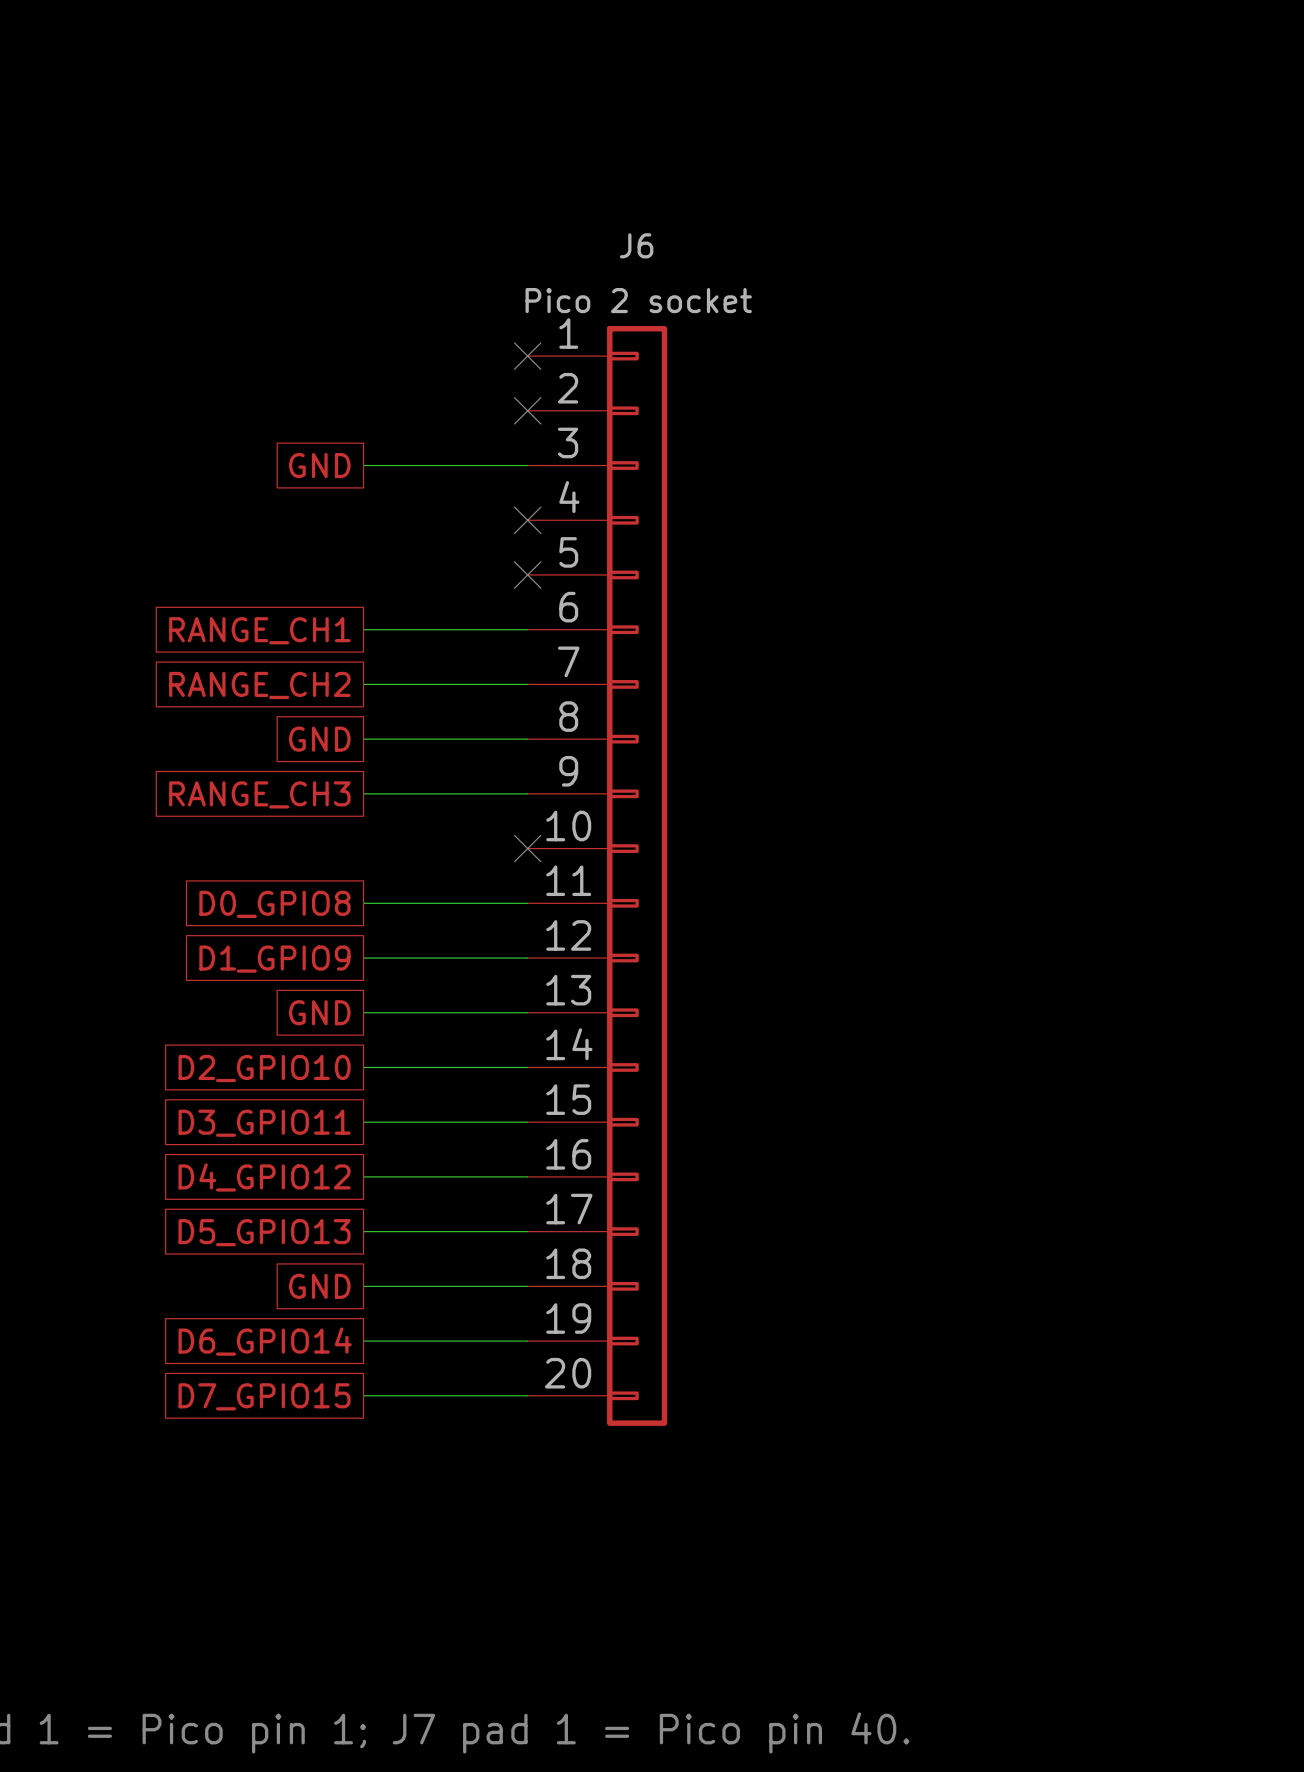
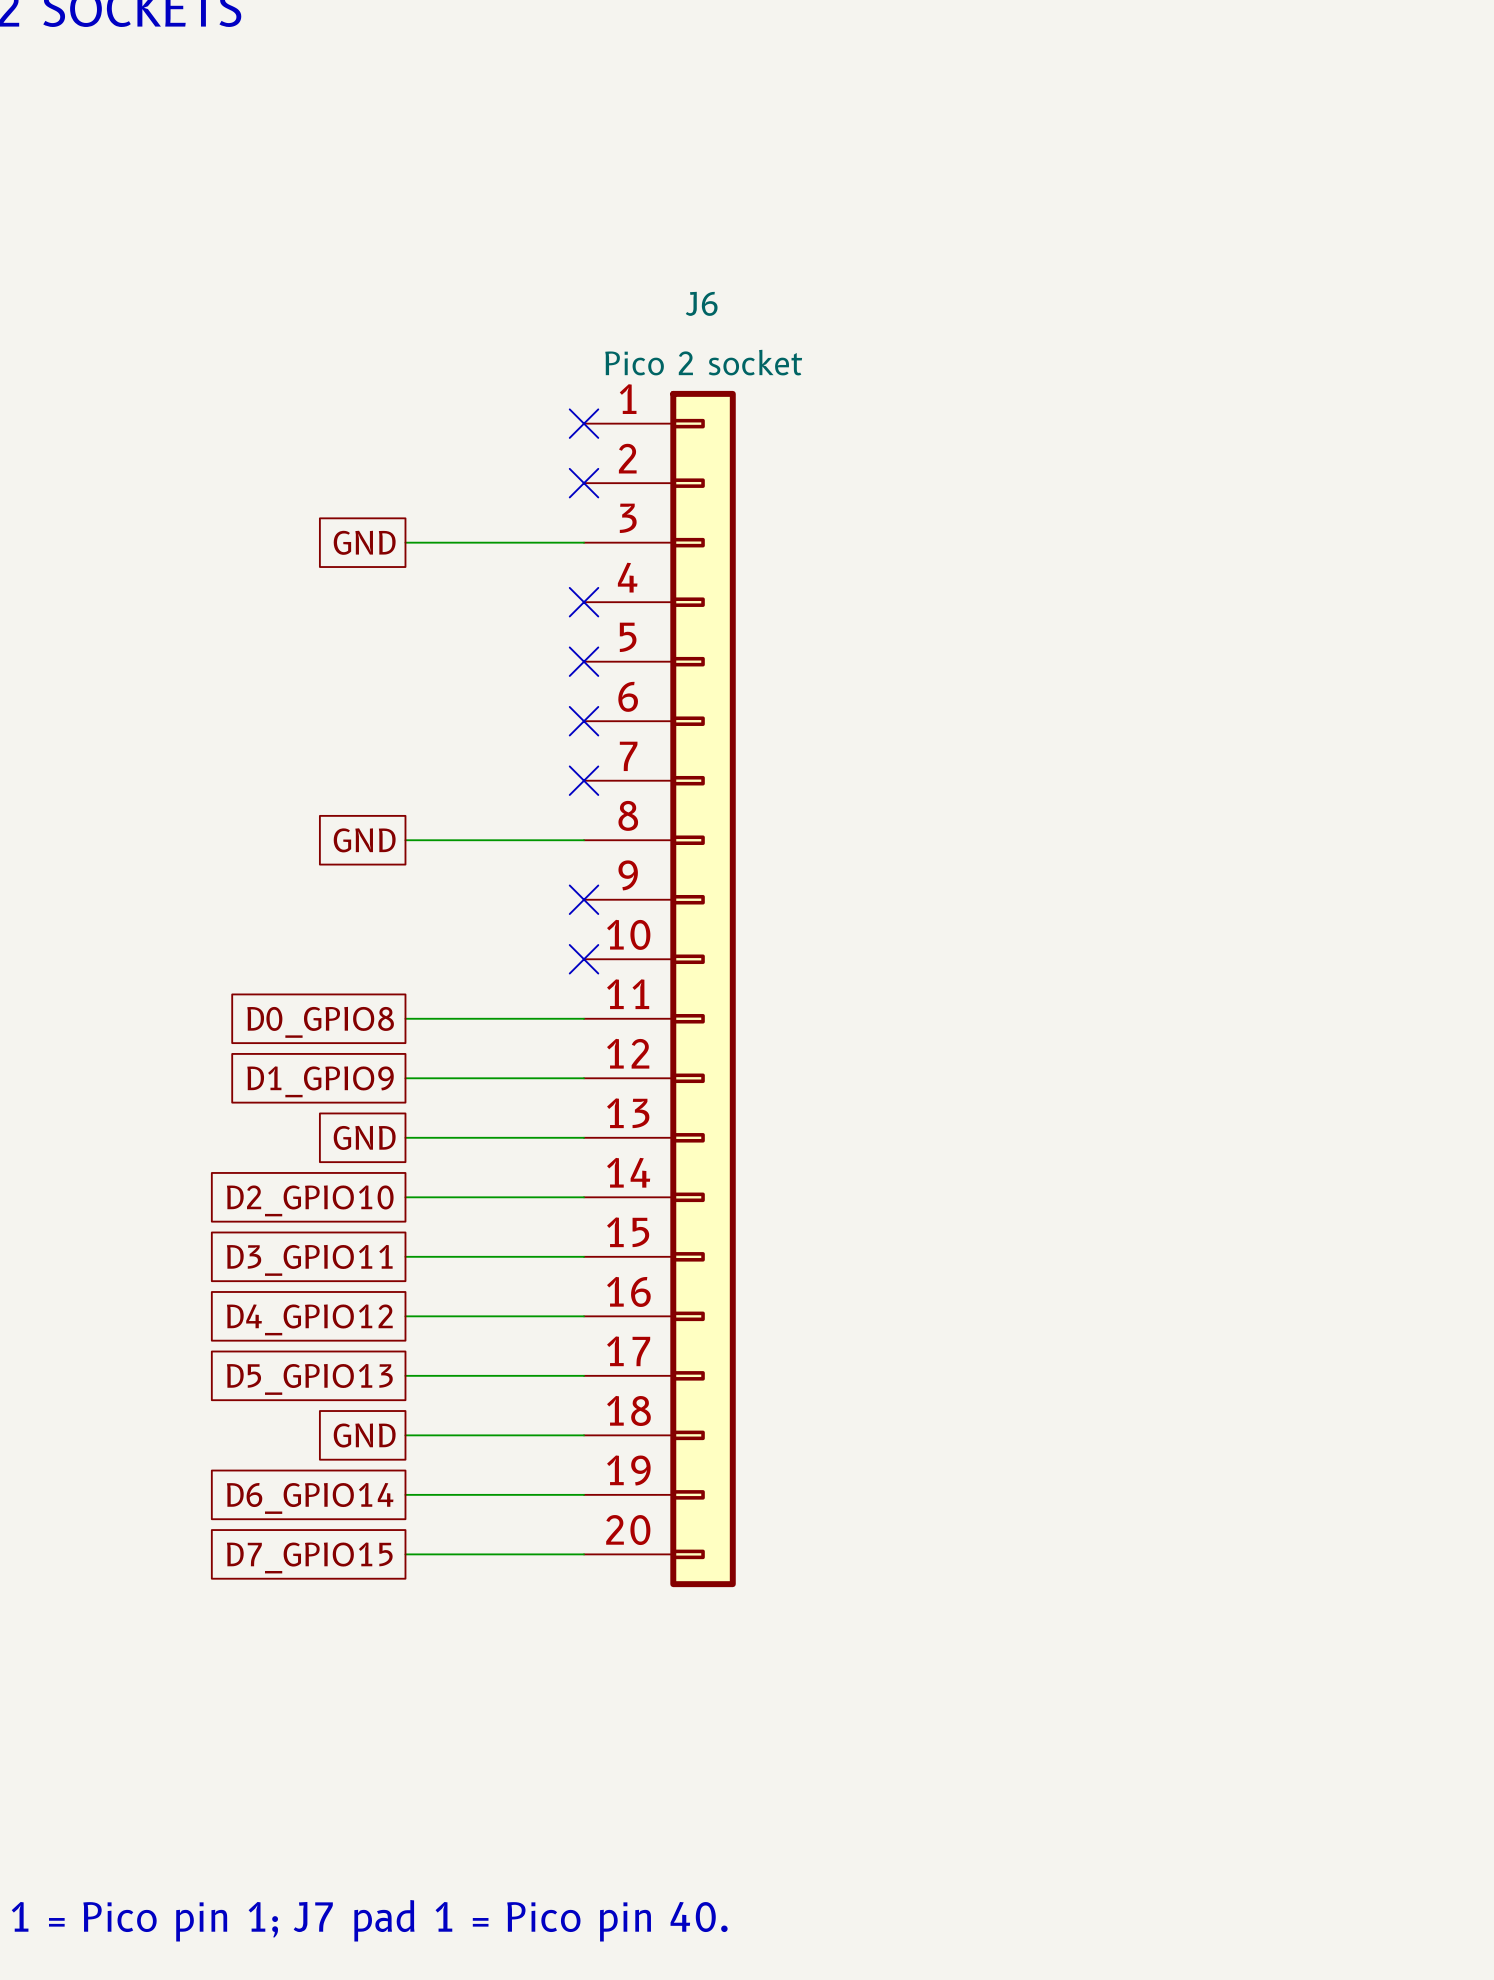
wire: (363, 629) (527, 629) -> none
no-connect mark: none -> (584, 721)
global label: RANGE_CH1 (259, 630) -> none
wire: (363, 684) (527, 684) -> none
no-connect mark: none -> (584, 780)
global label: RANGE_CH2 (259, 685) -> none
wire: (363, 793) (527, 793) -> none
no-connect mark: none -> (584, 899)
global label: RANGE_CH3 (259, 794) -> none

